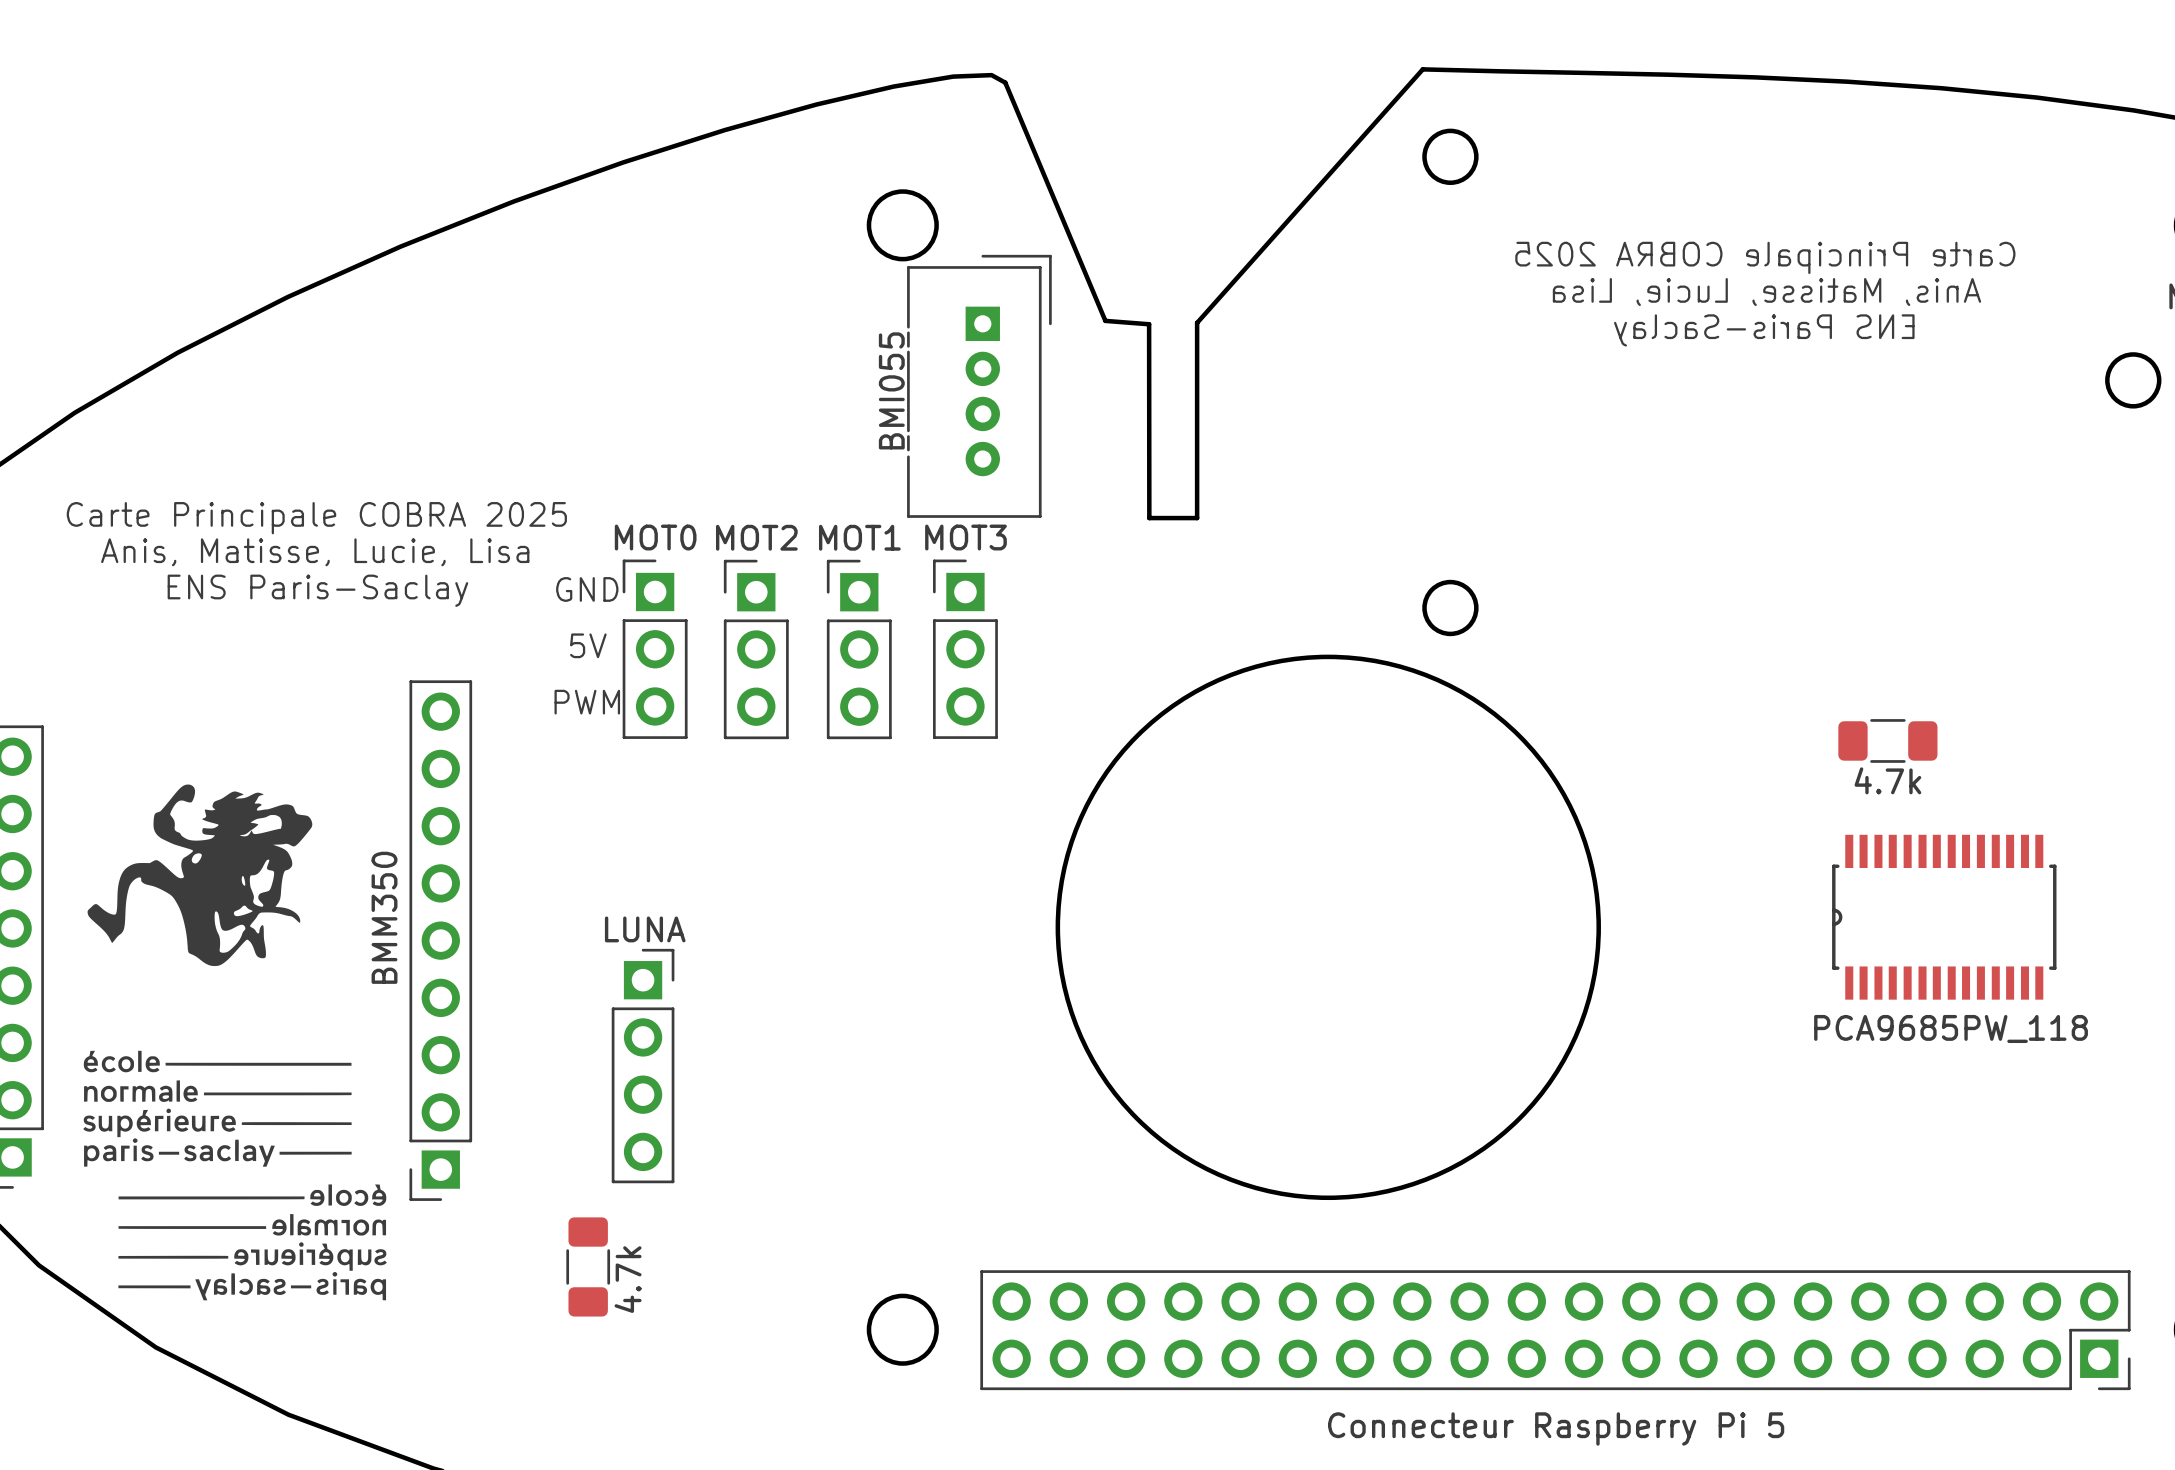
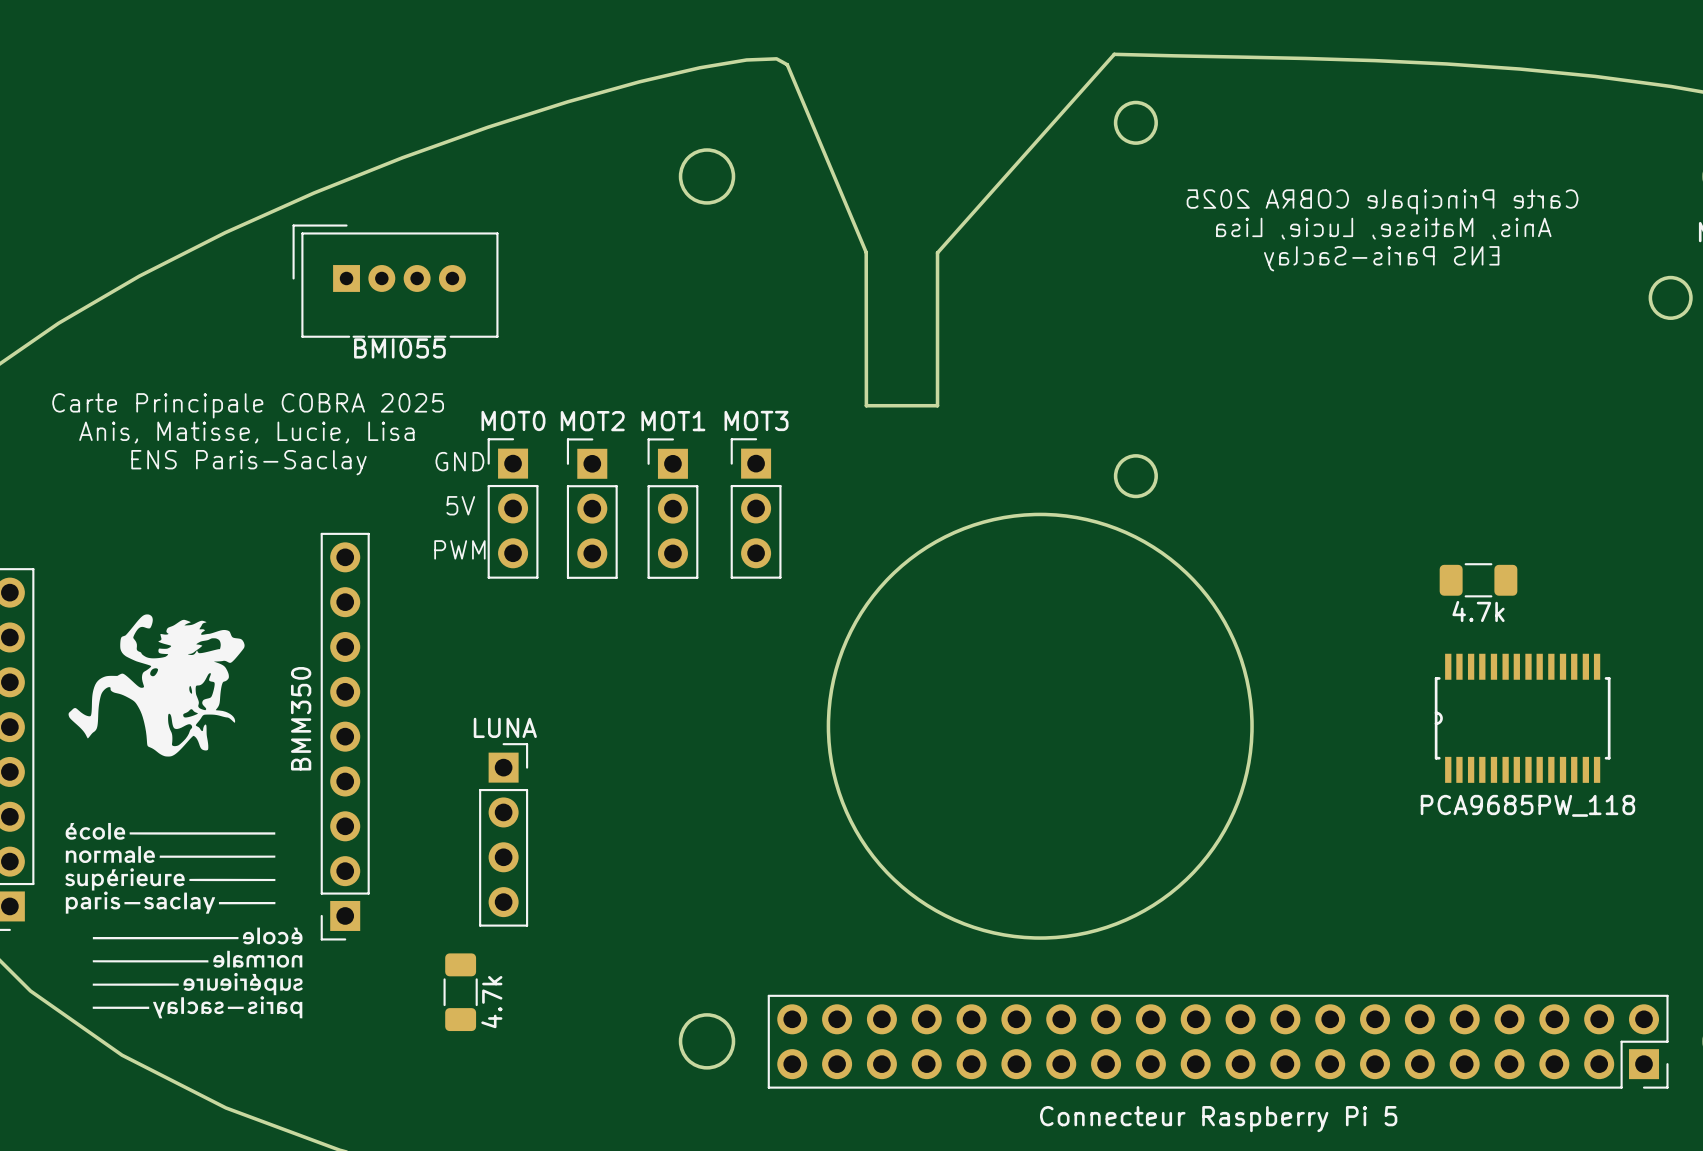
board edge: (1005, 82) (1105, 320) (1149, 324) (1149, 518) -> (787, 64) (866, 252) (866, 405) (900, 405)
BMI055 rotation: 0° (979, 386) -> 90° counterclockwise (395, 281)
BMI055 position: (979, 386) -> (395, 281)

